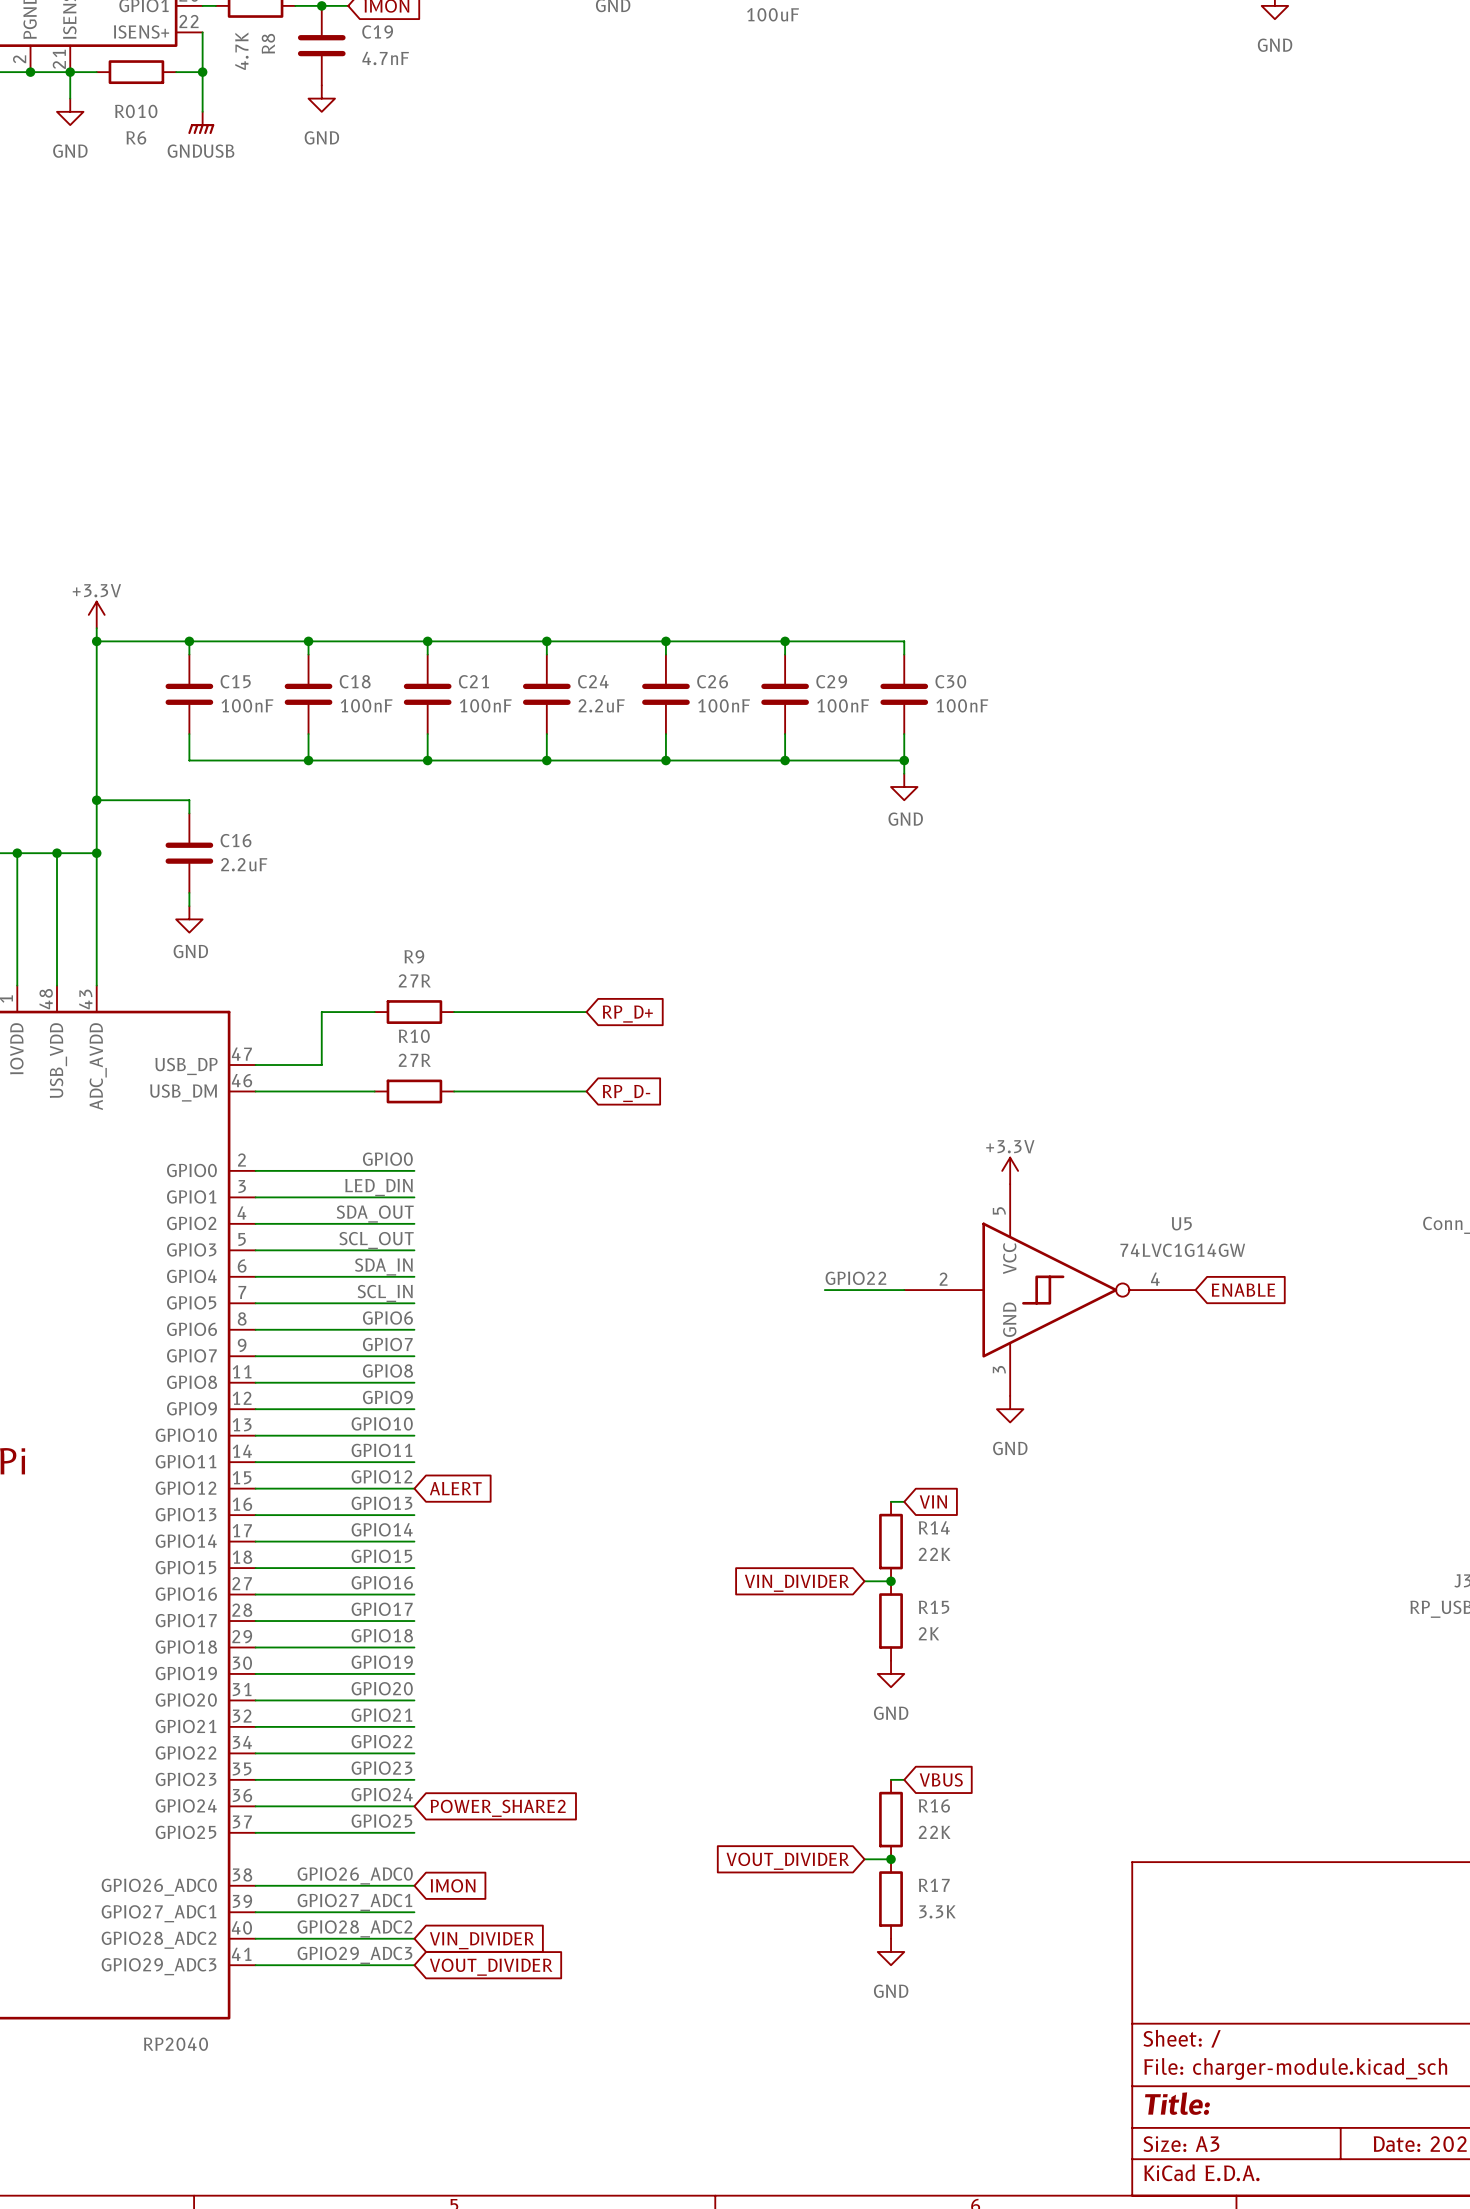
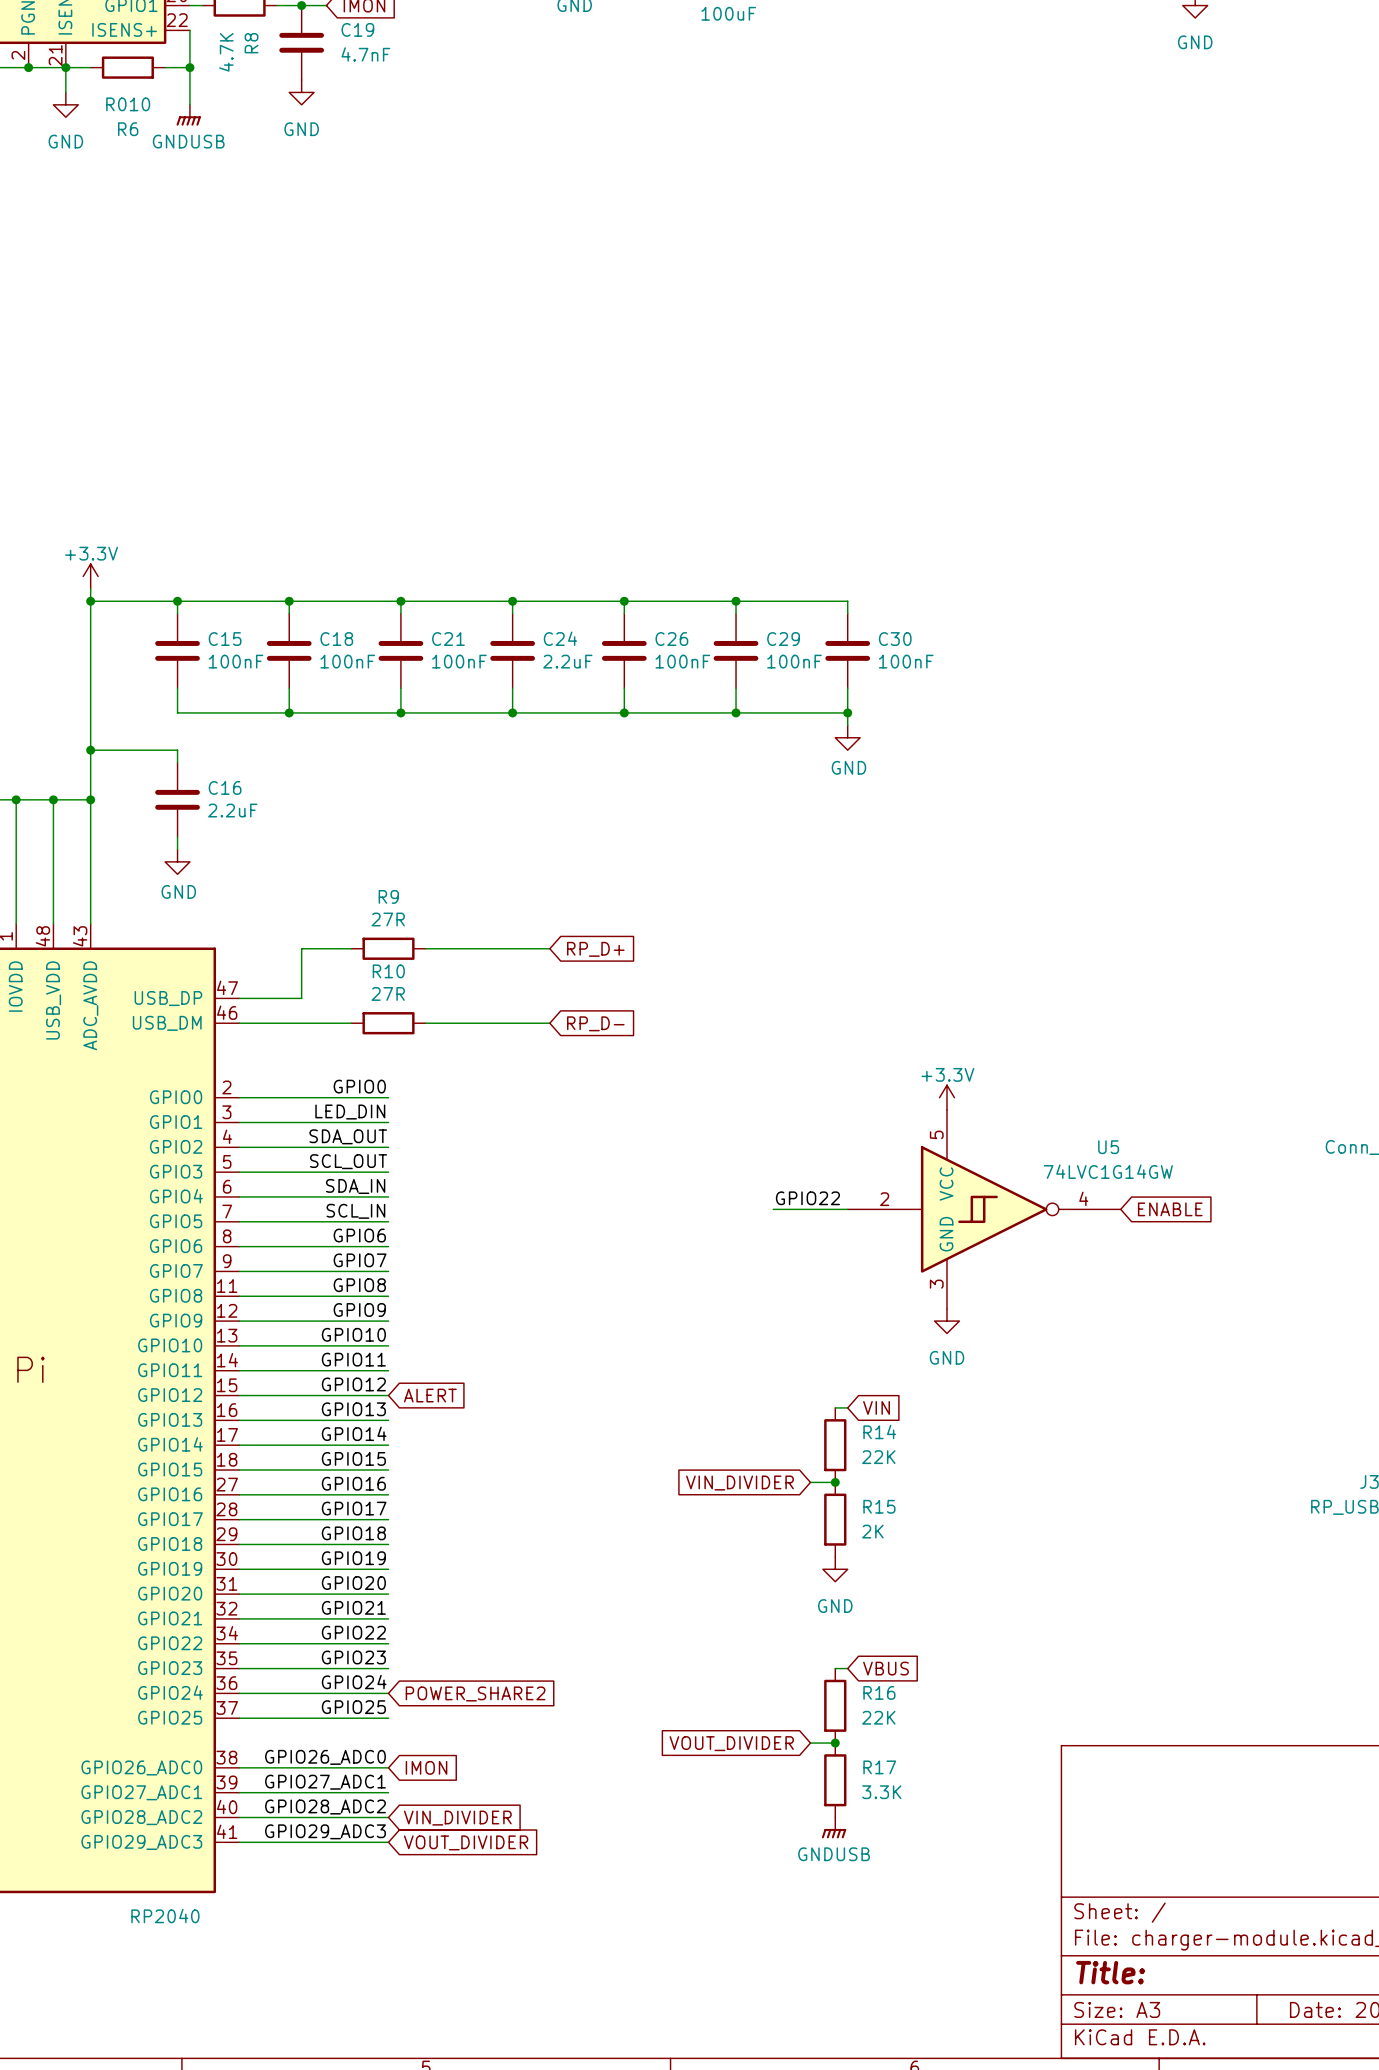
power symbol: GND (891, 1951) -> GNDUSB (834, 1827)

